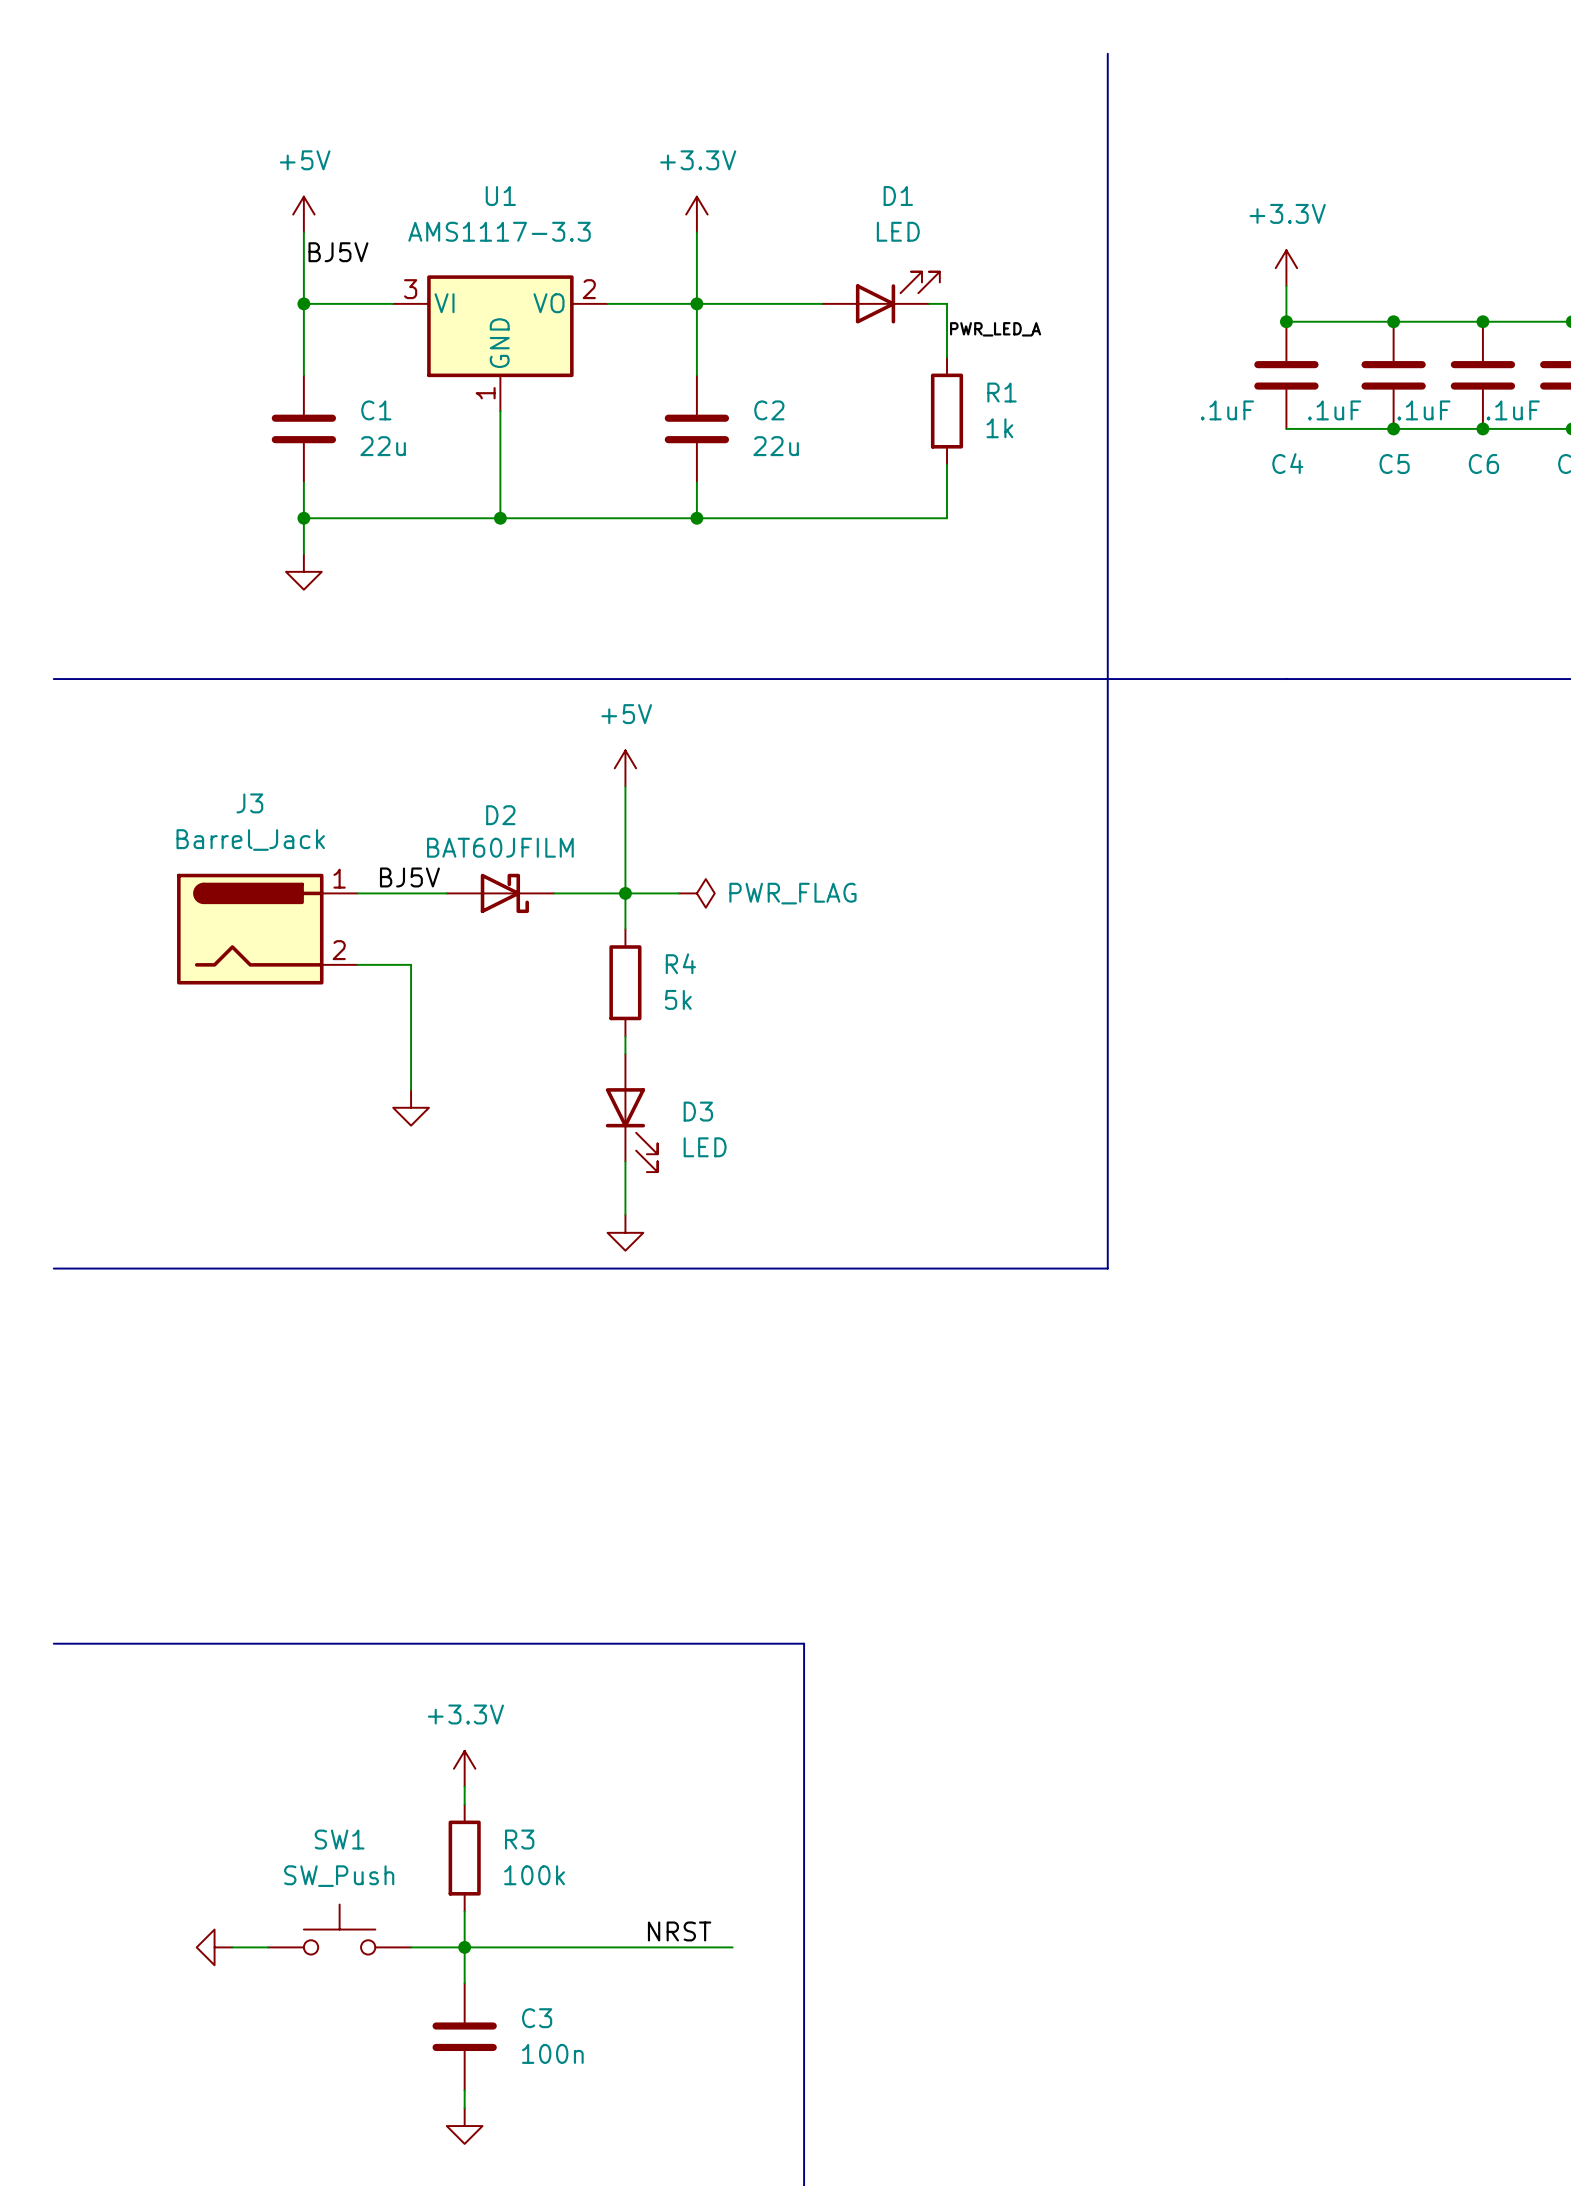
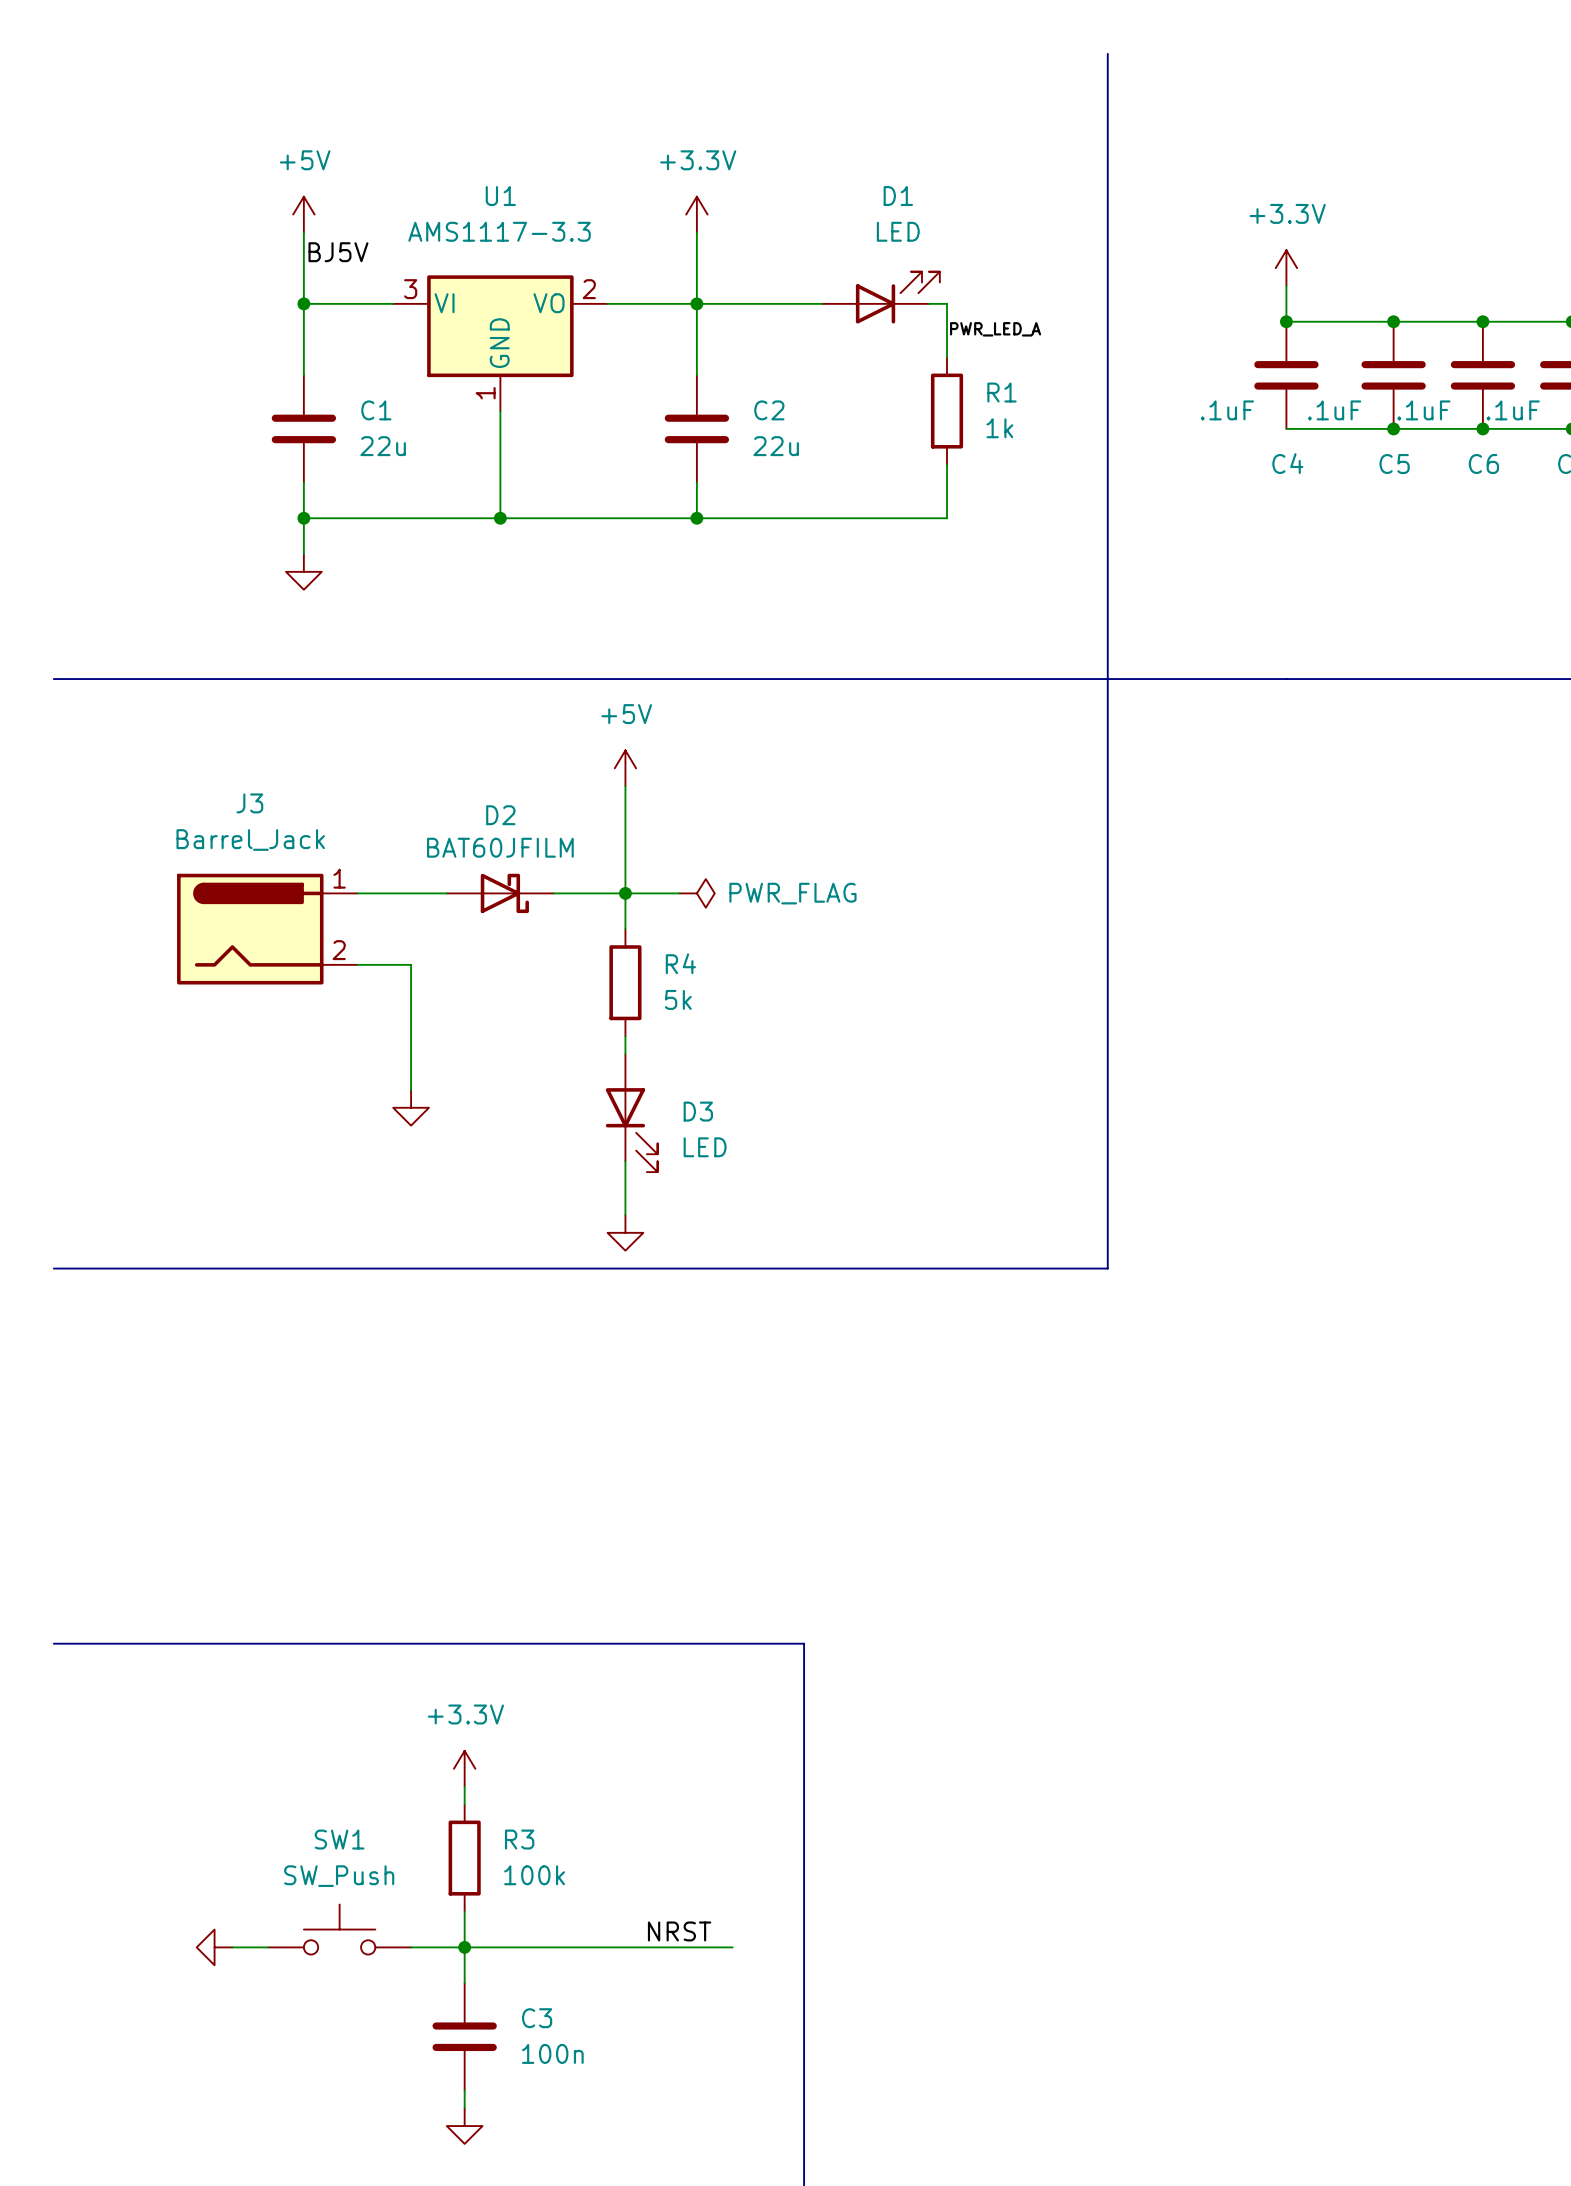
label: BJ5V (409, 877) -> none

